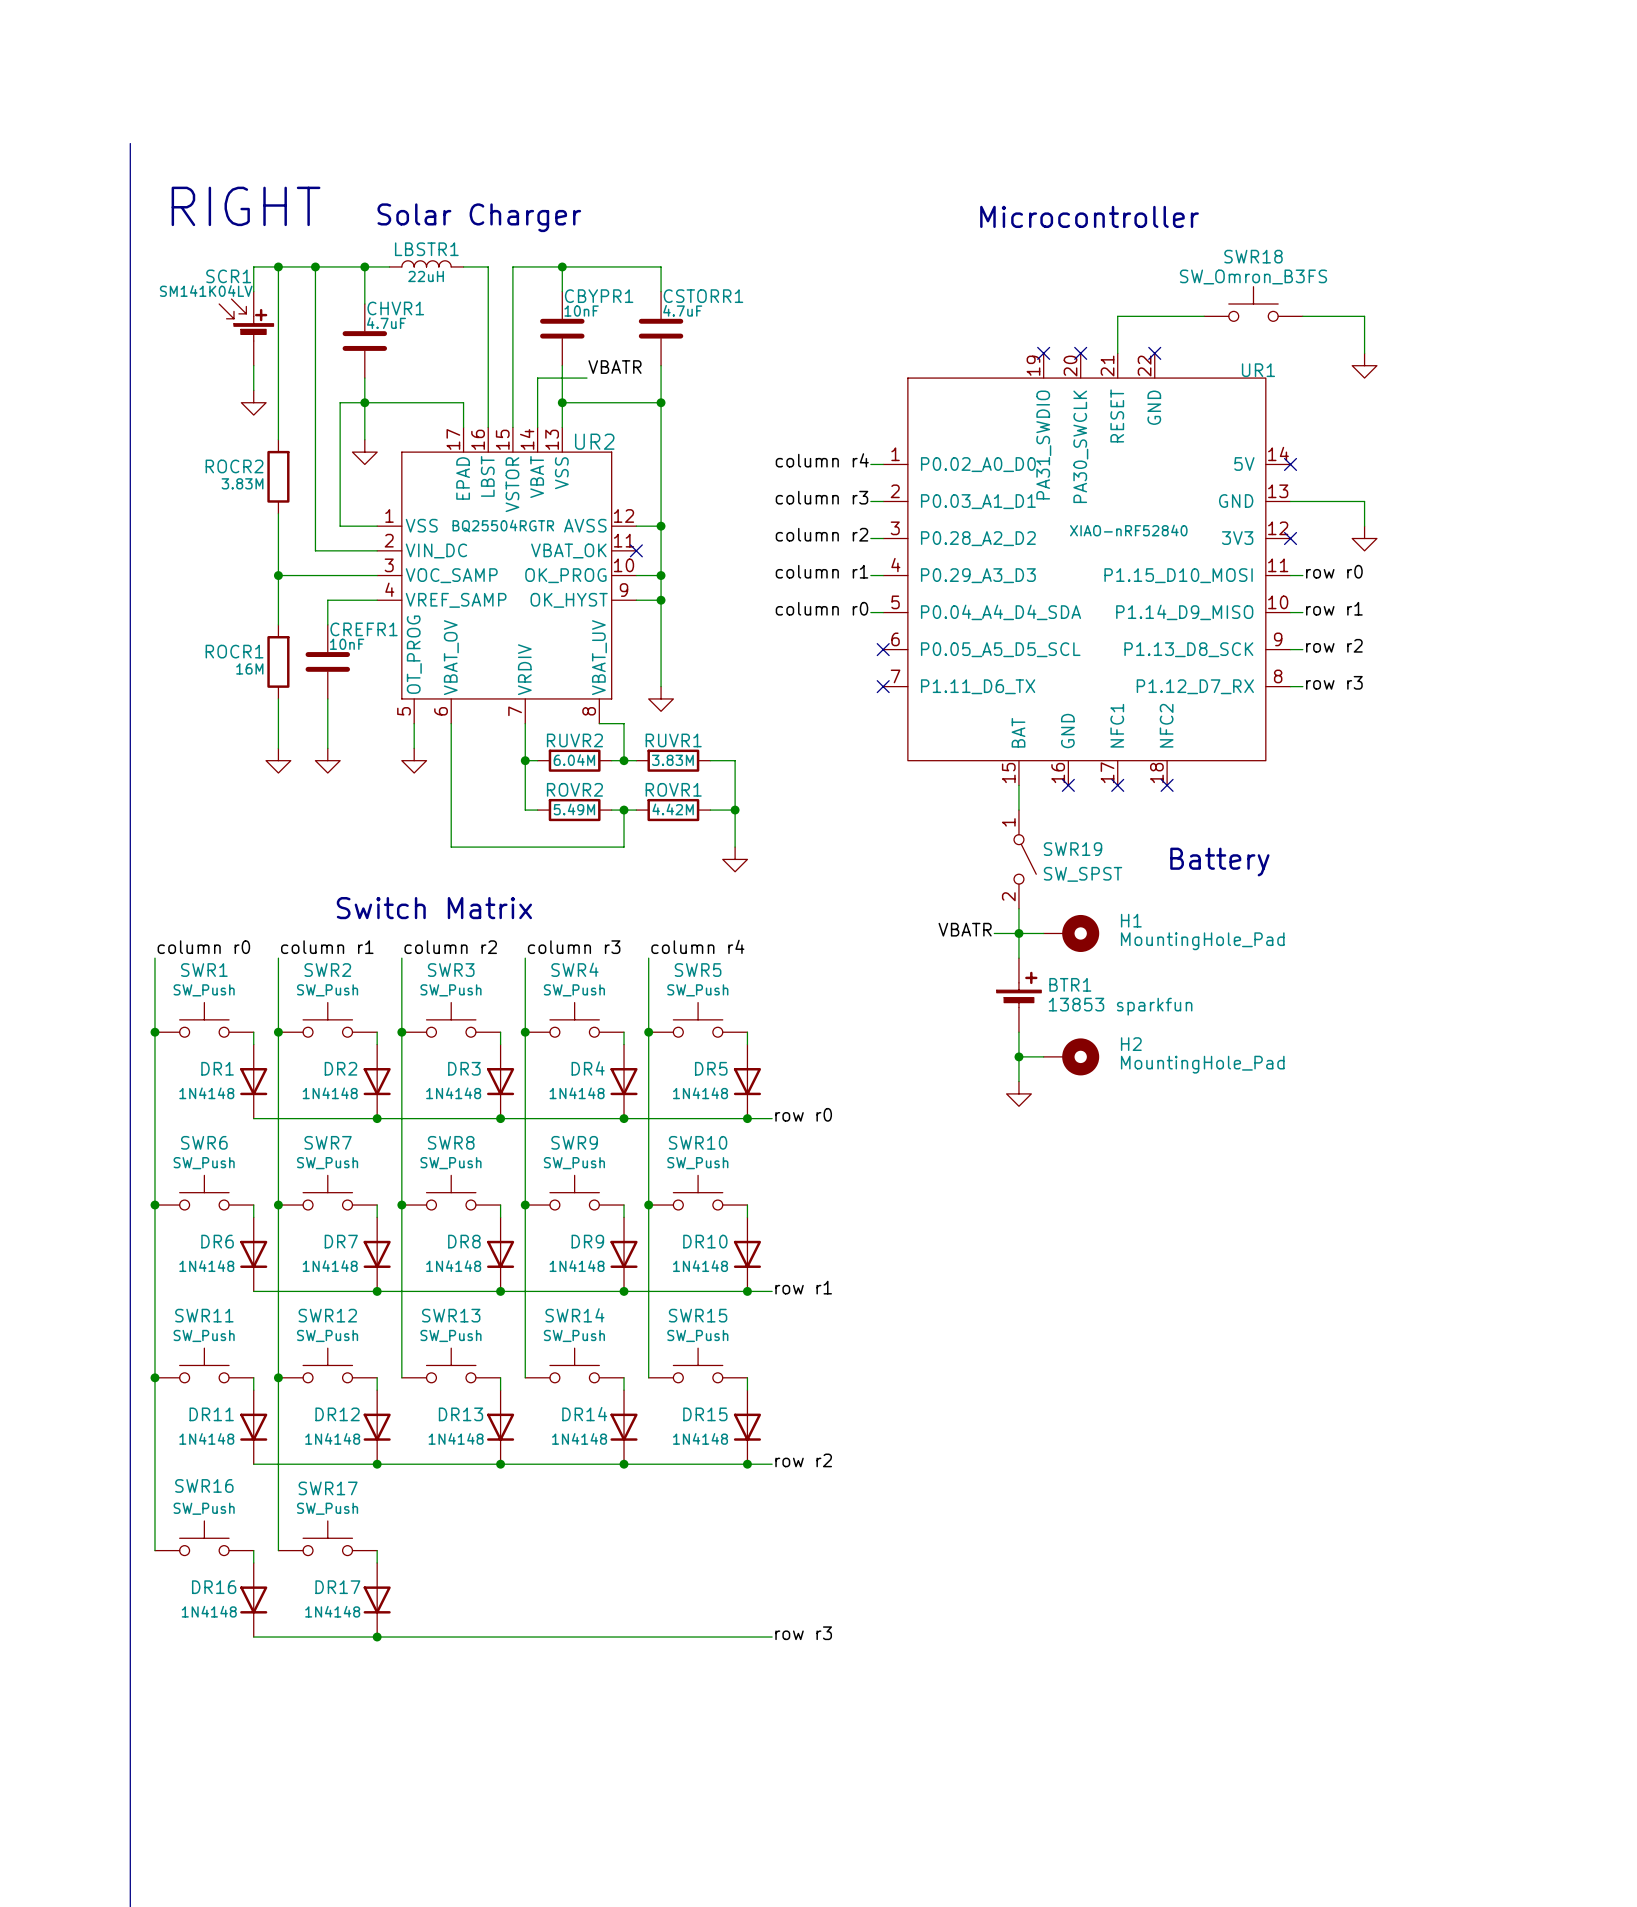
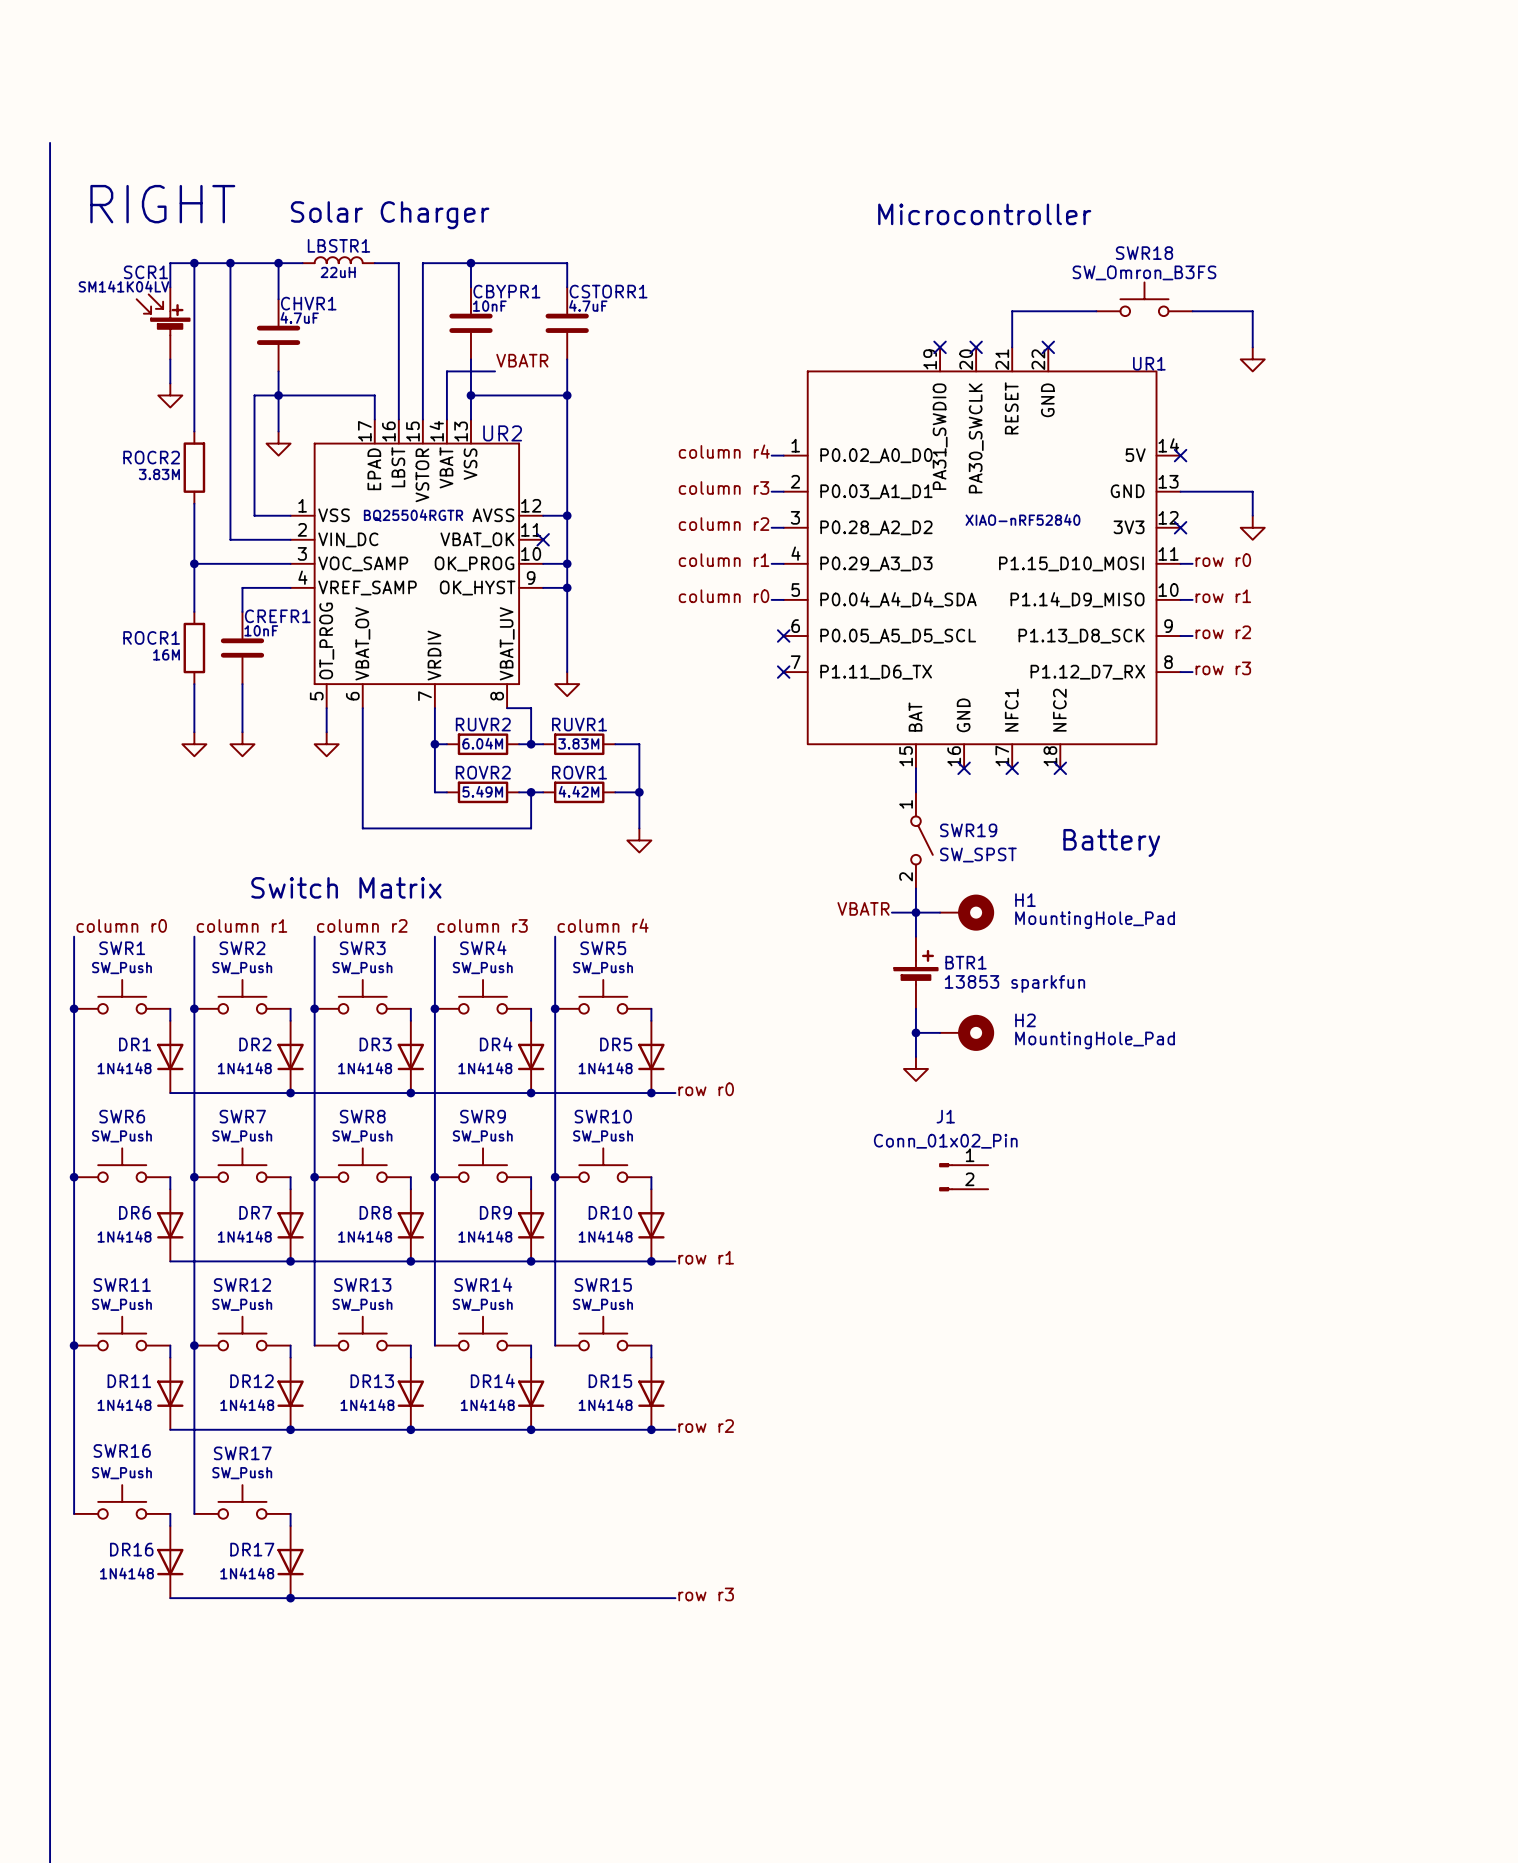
J1: none -> Conn_01x02_Pin (963, 1177)

